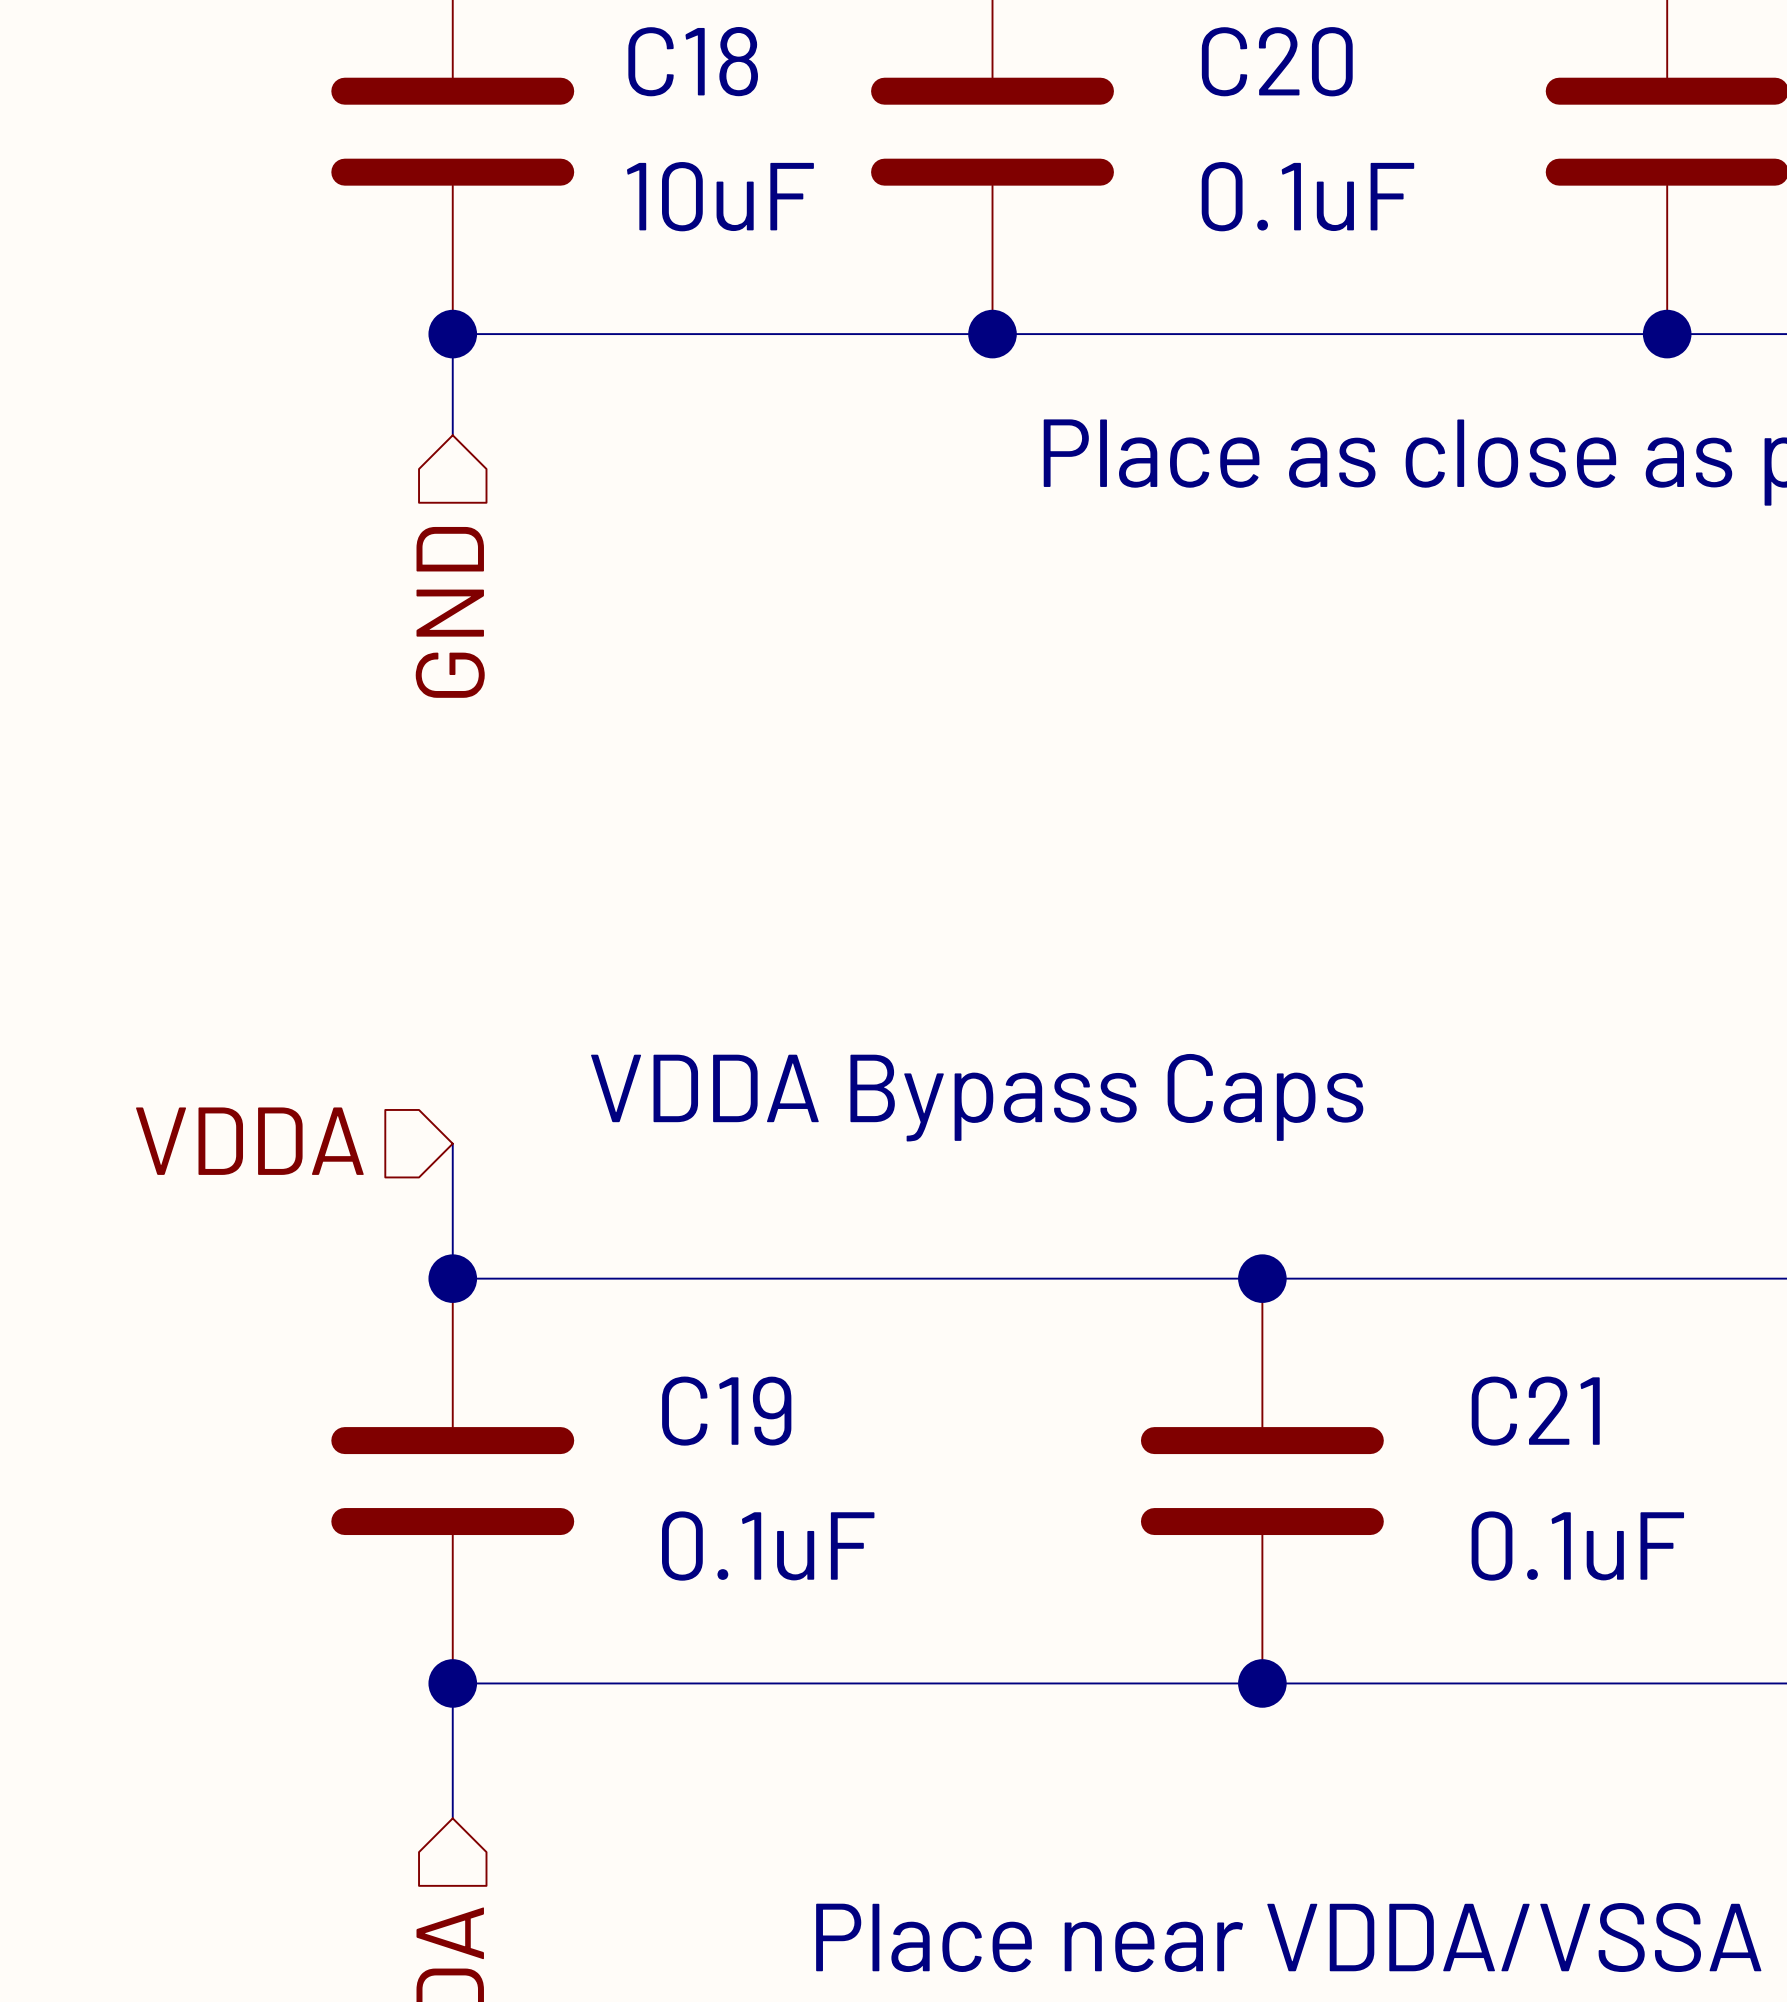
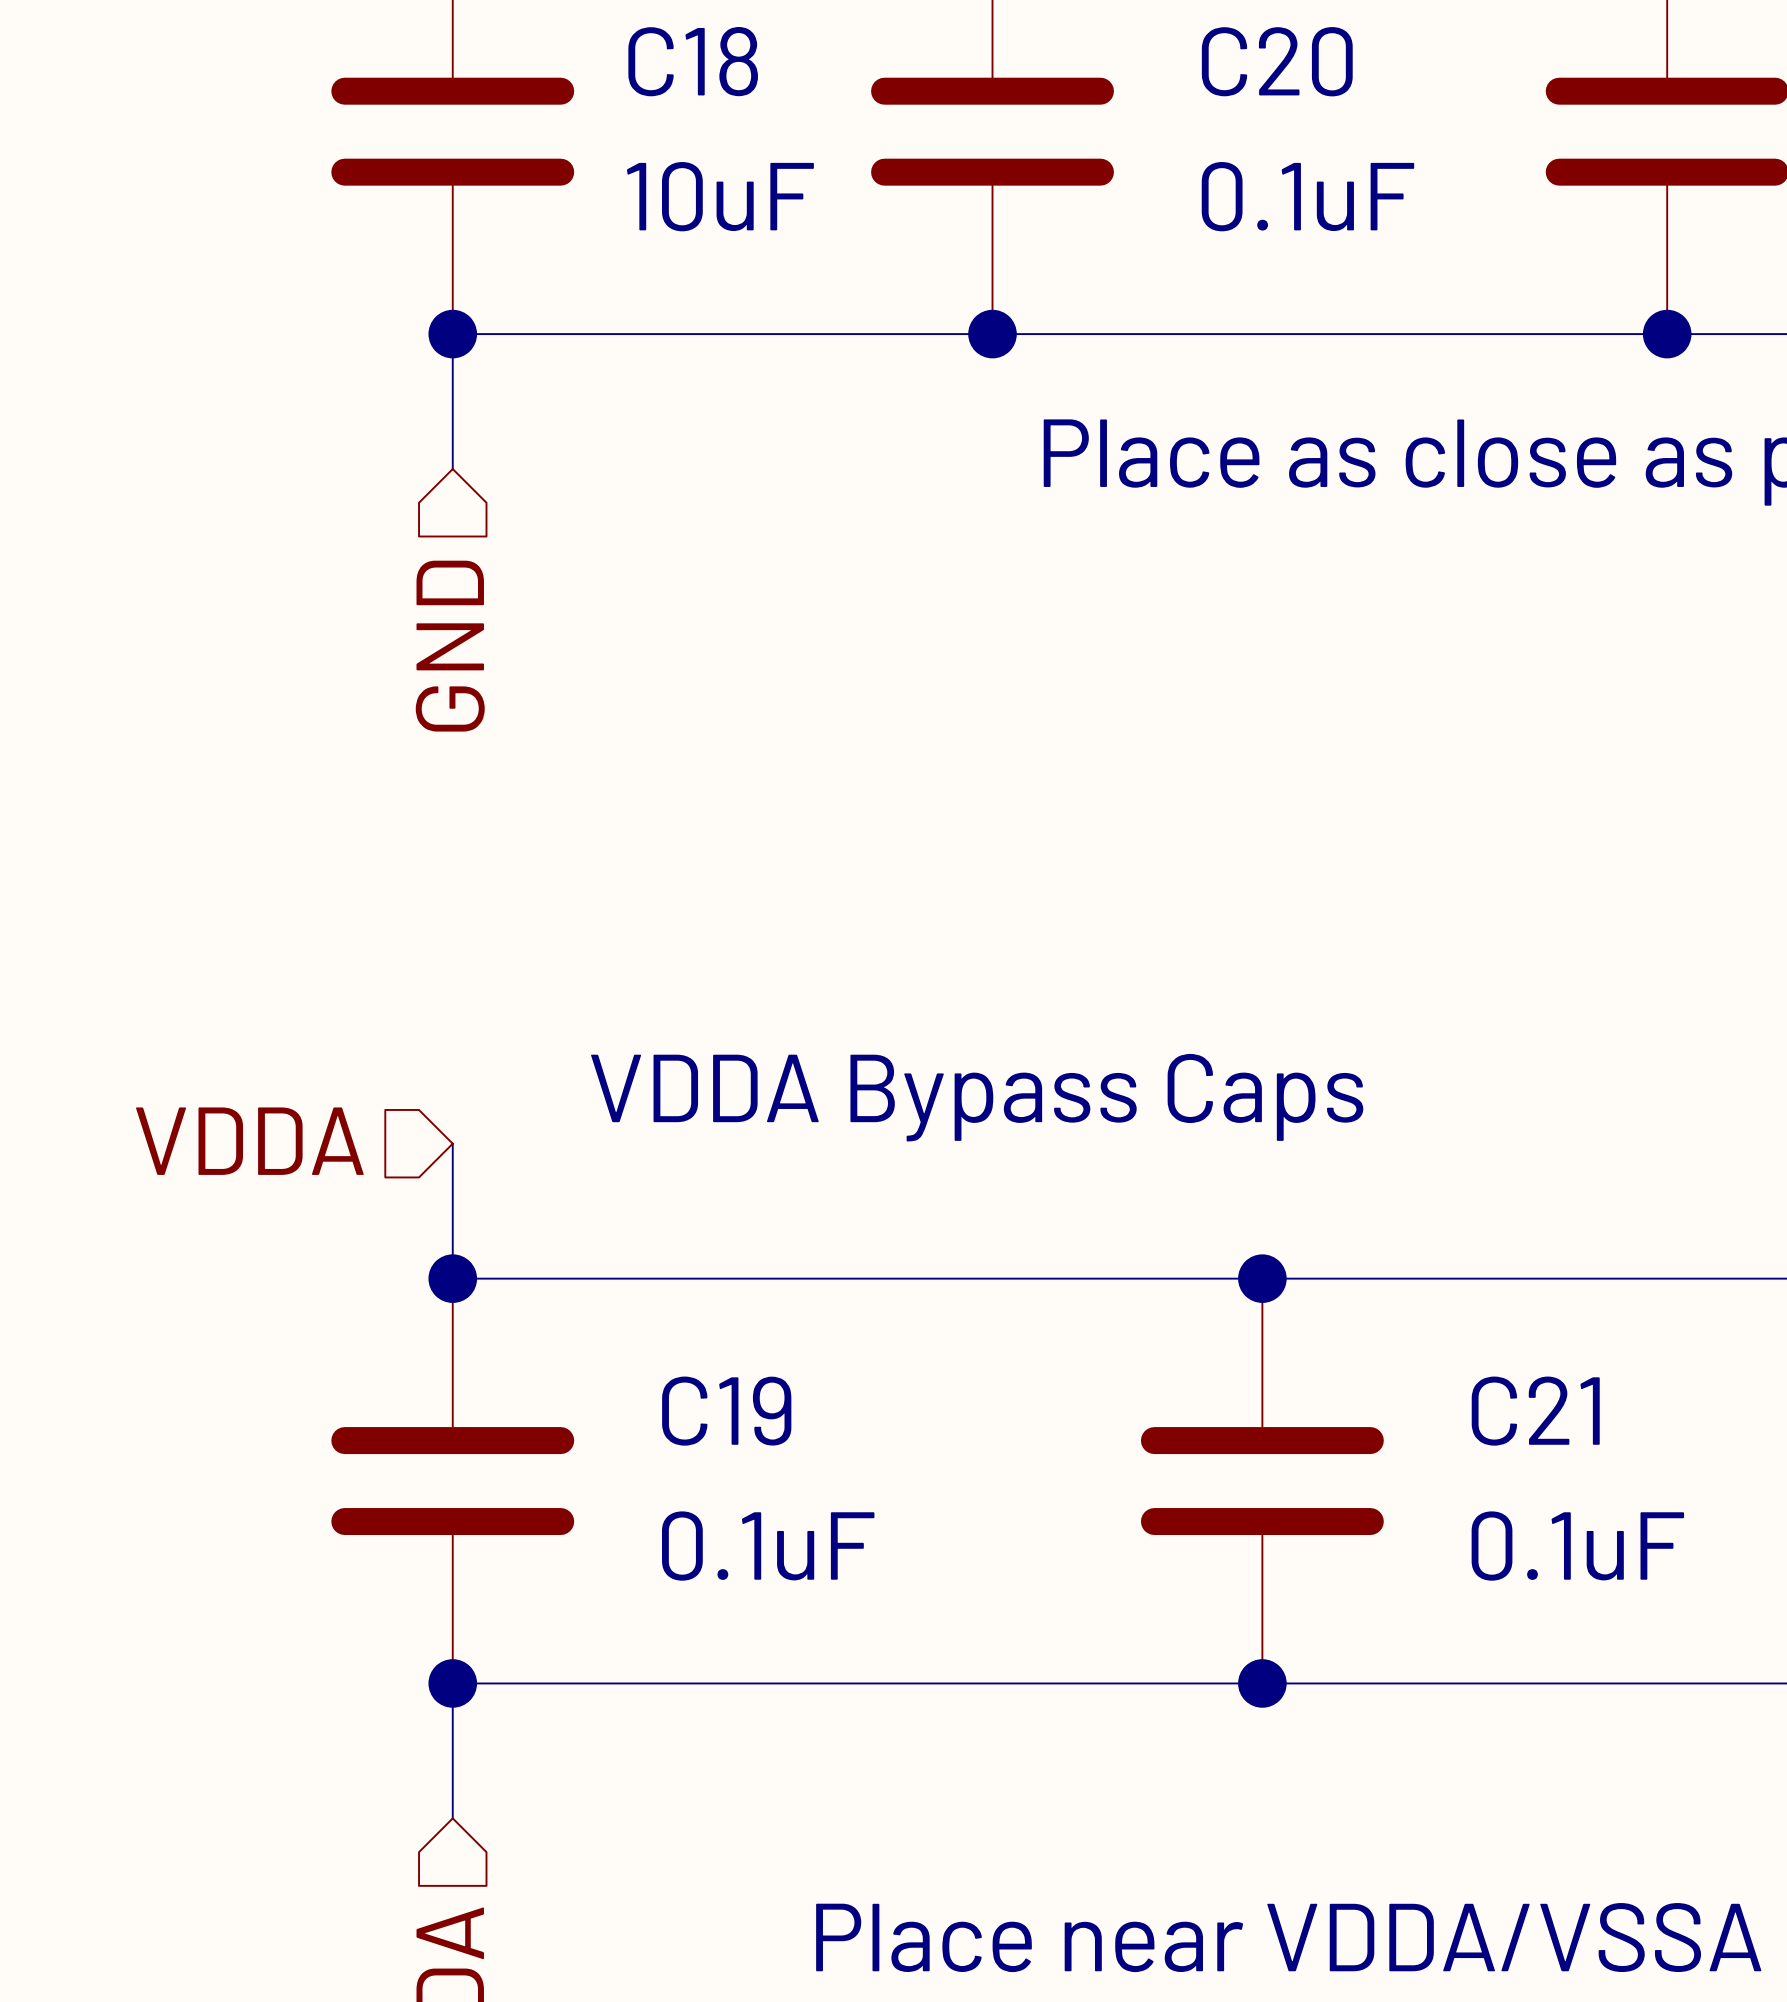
wire: none -> (452, 435) (452, 469)
hierarchical label position: GND (450, 612) -> GND (450, 646)

